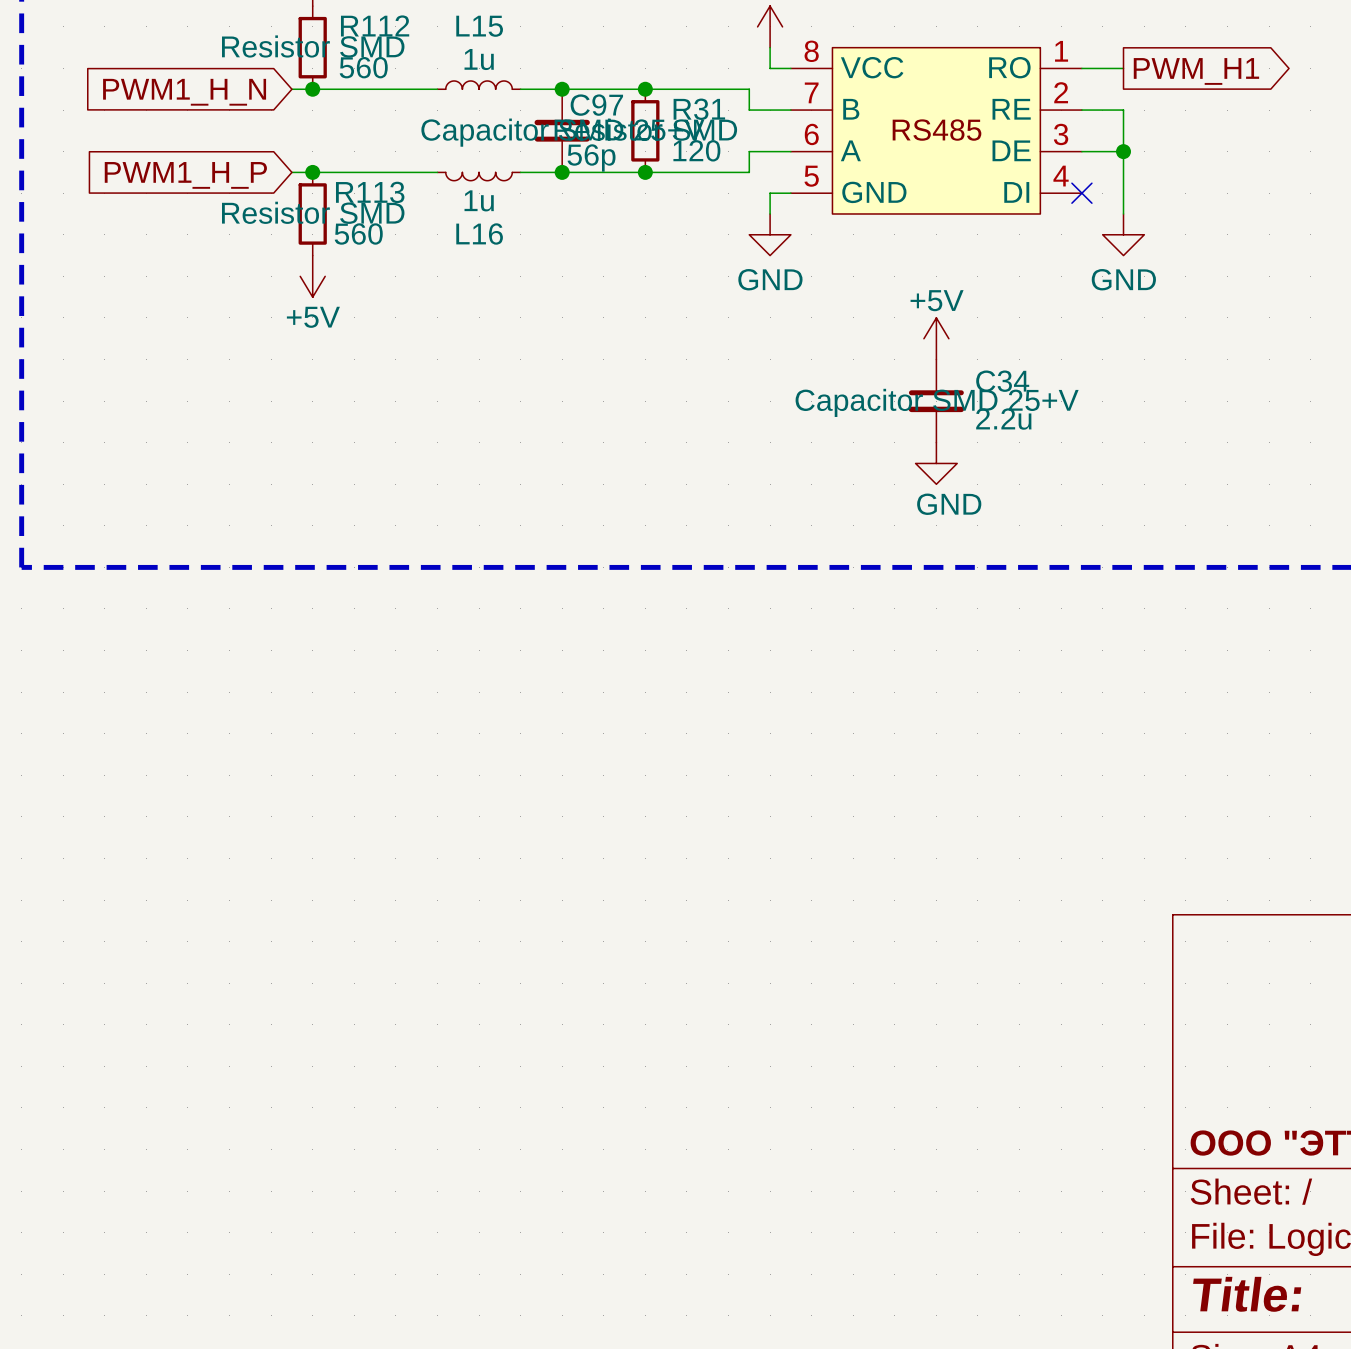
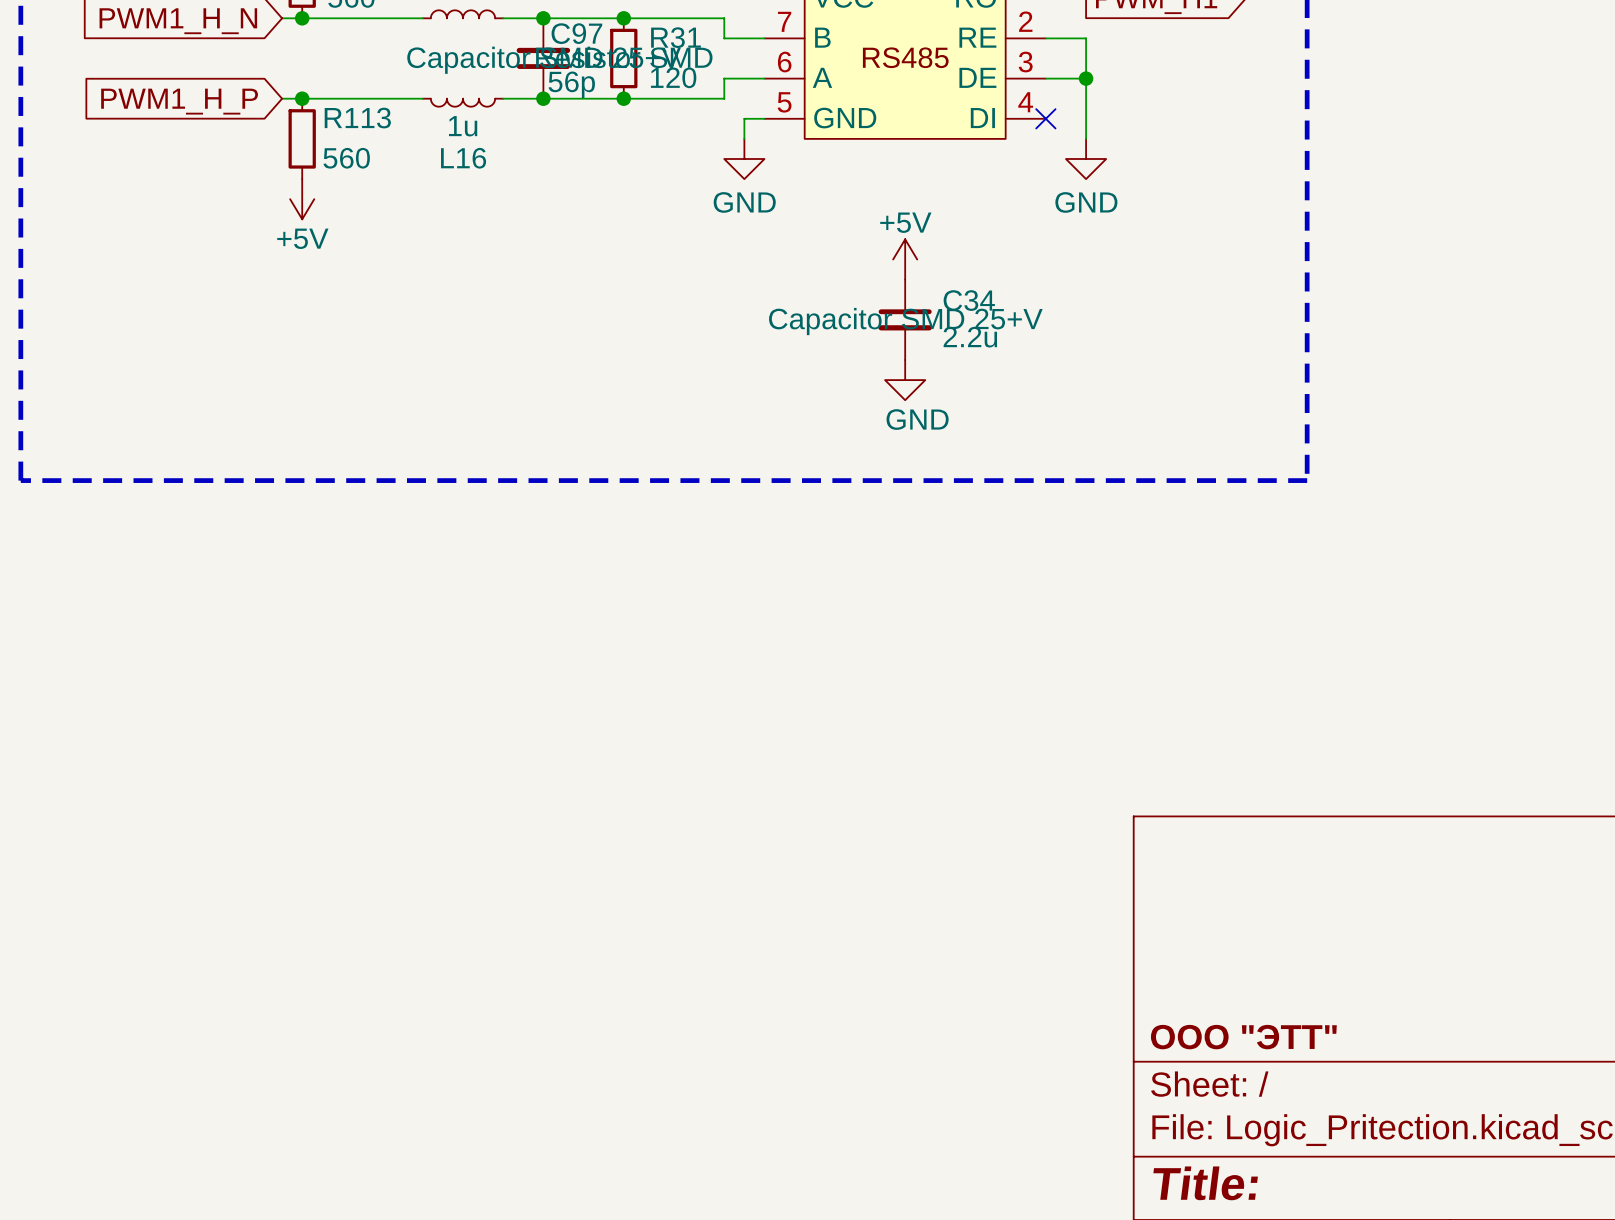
R113 text: Resistor SMD (313, 212) -> none

